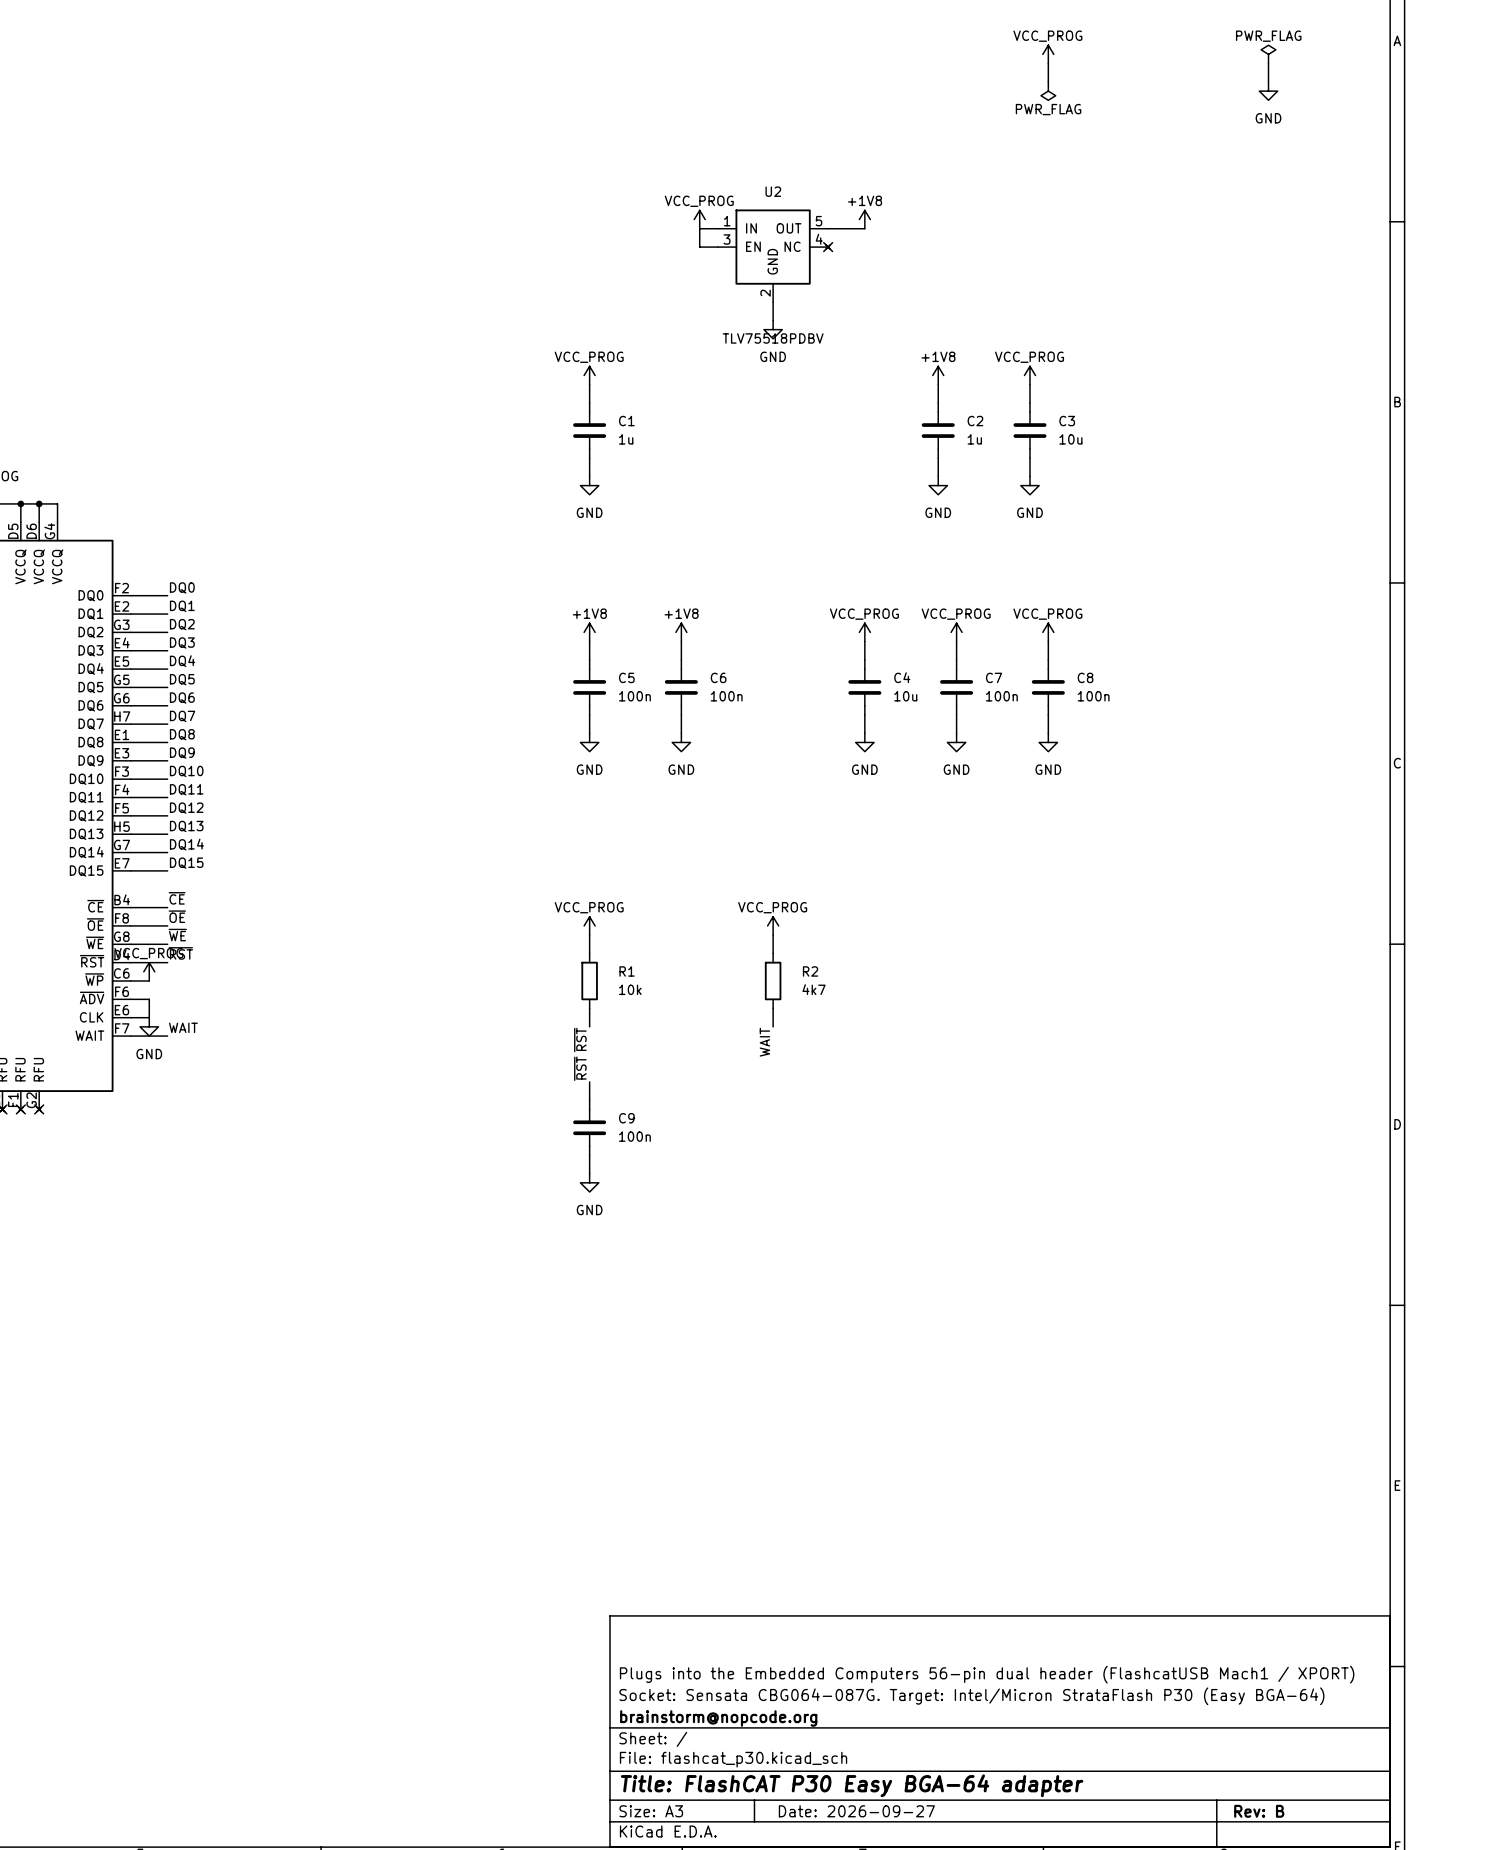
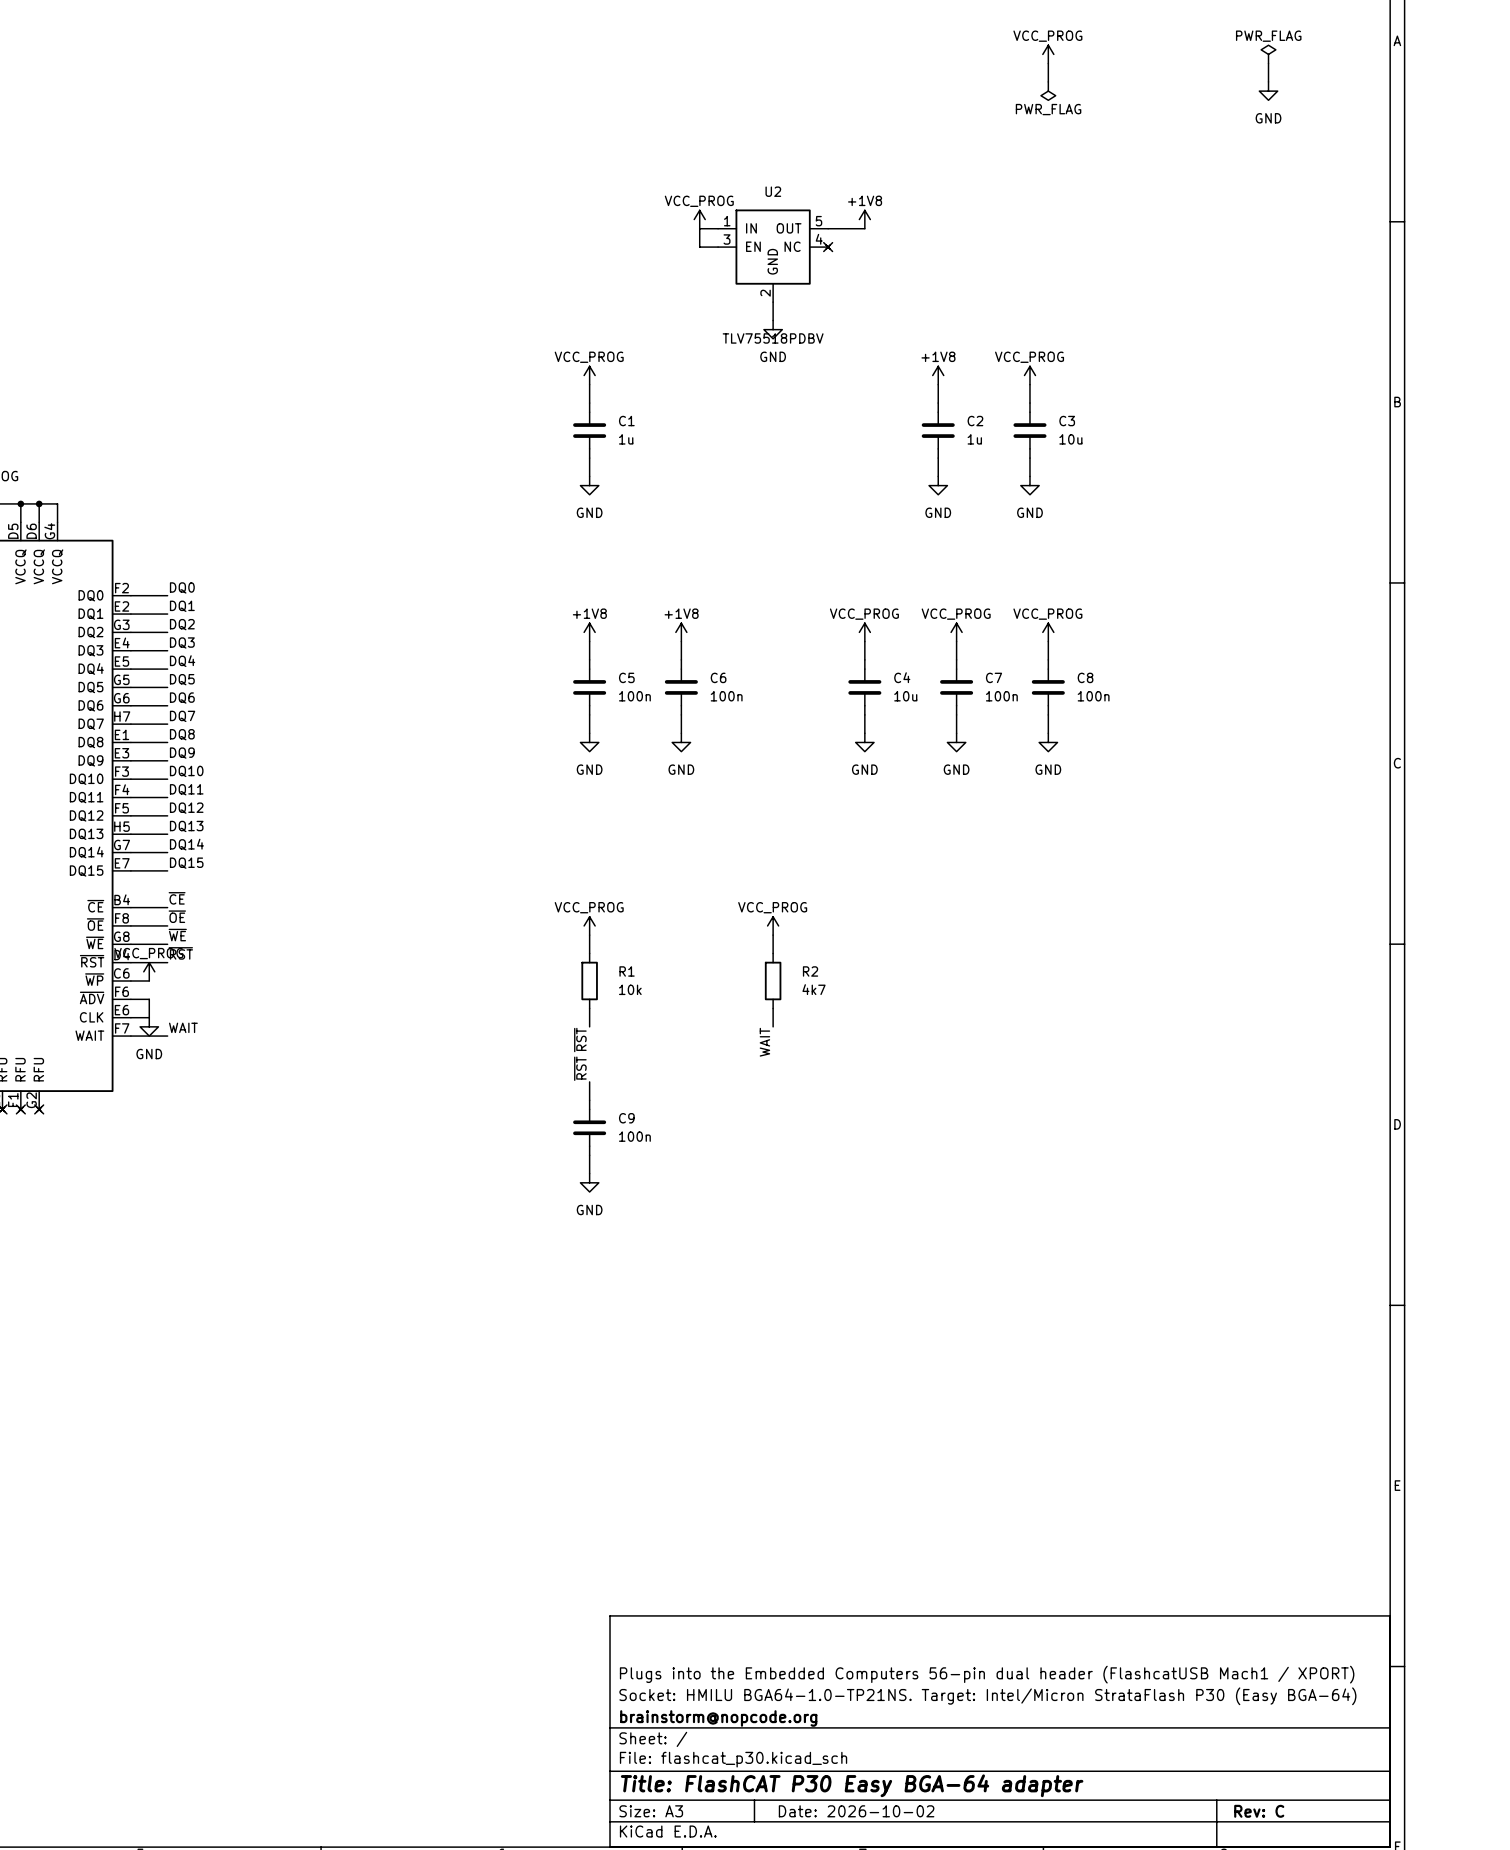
title block: Socket: Sensata CBG064-087G. Target: Intel/Micron StrataFlash P30 (Easy BGA-64) (971, 1696) -> Socket: HMILU BGA64-1.0-TP21NS. Target: Intel/Micron StrataFlash P30 (Easy BGA-64) (987, 1696)
title block: Date: 2026-09-27 (856, 1811) -> Date: 2026-10-02 (856, 1811)
title block: Rev: B (1259, 1811) -> Rev: C (1259, 1811)

